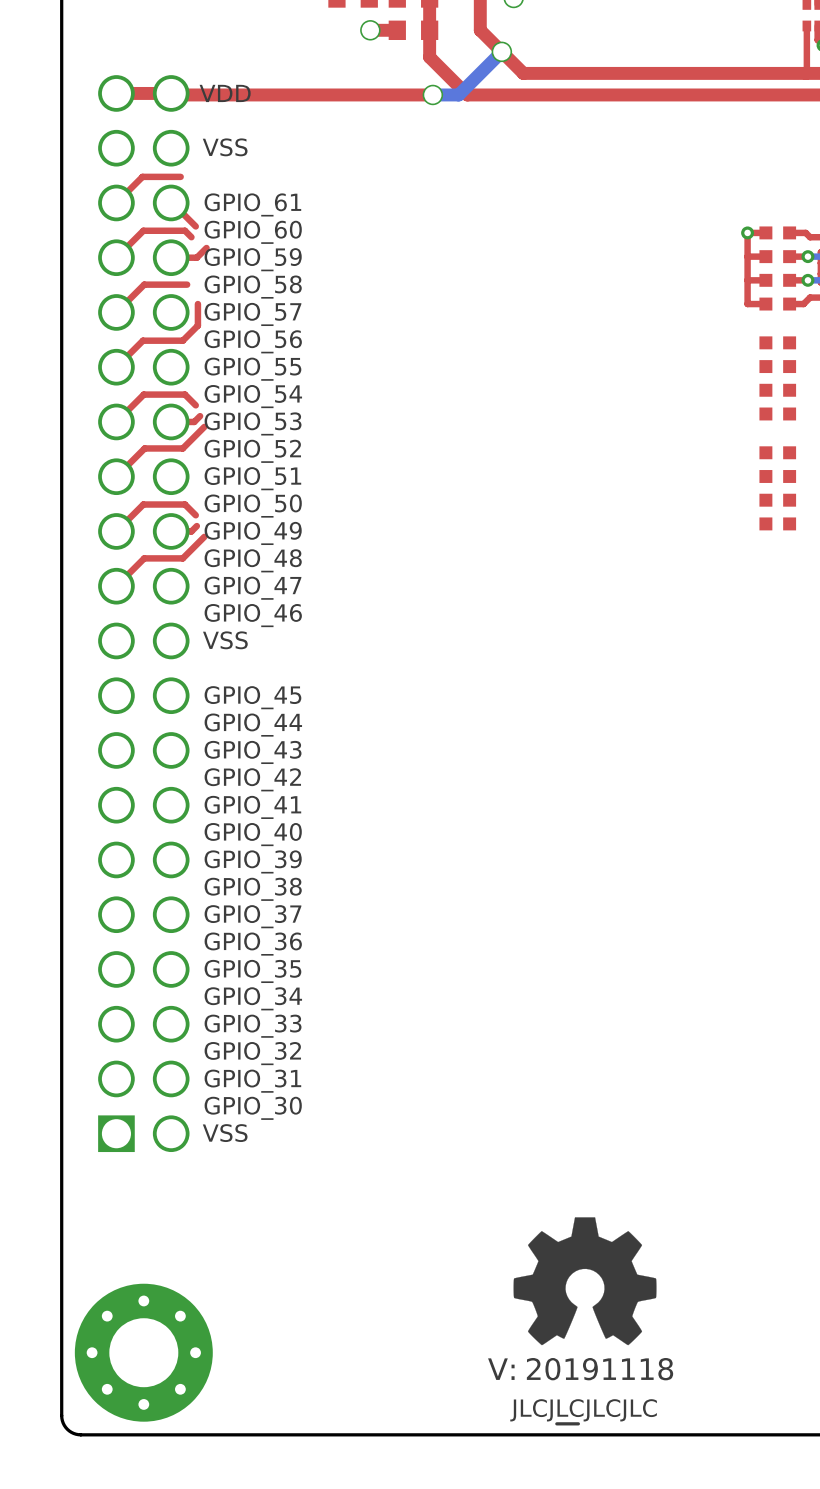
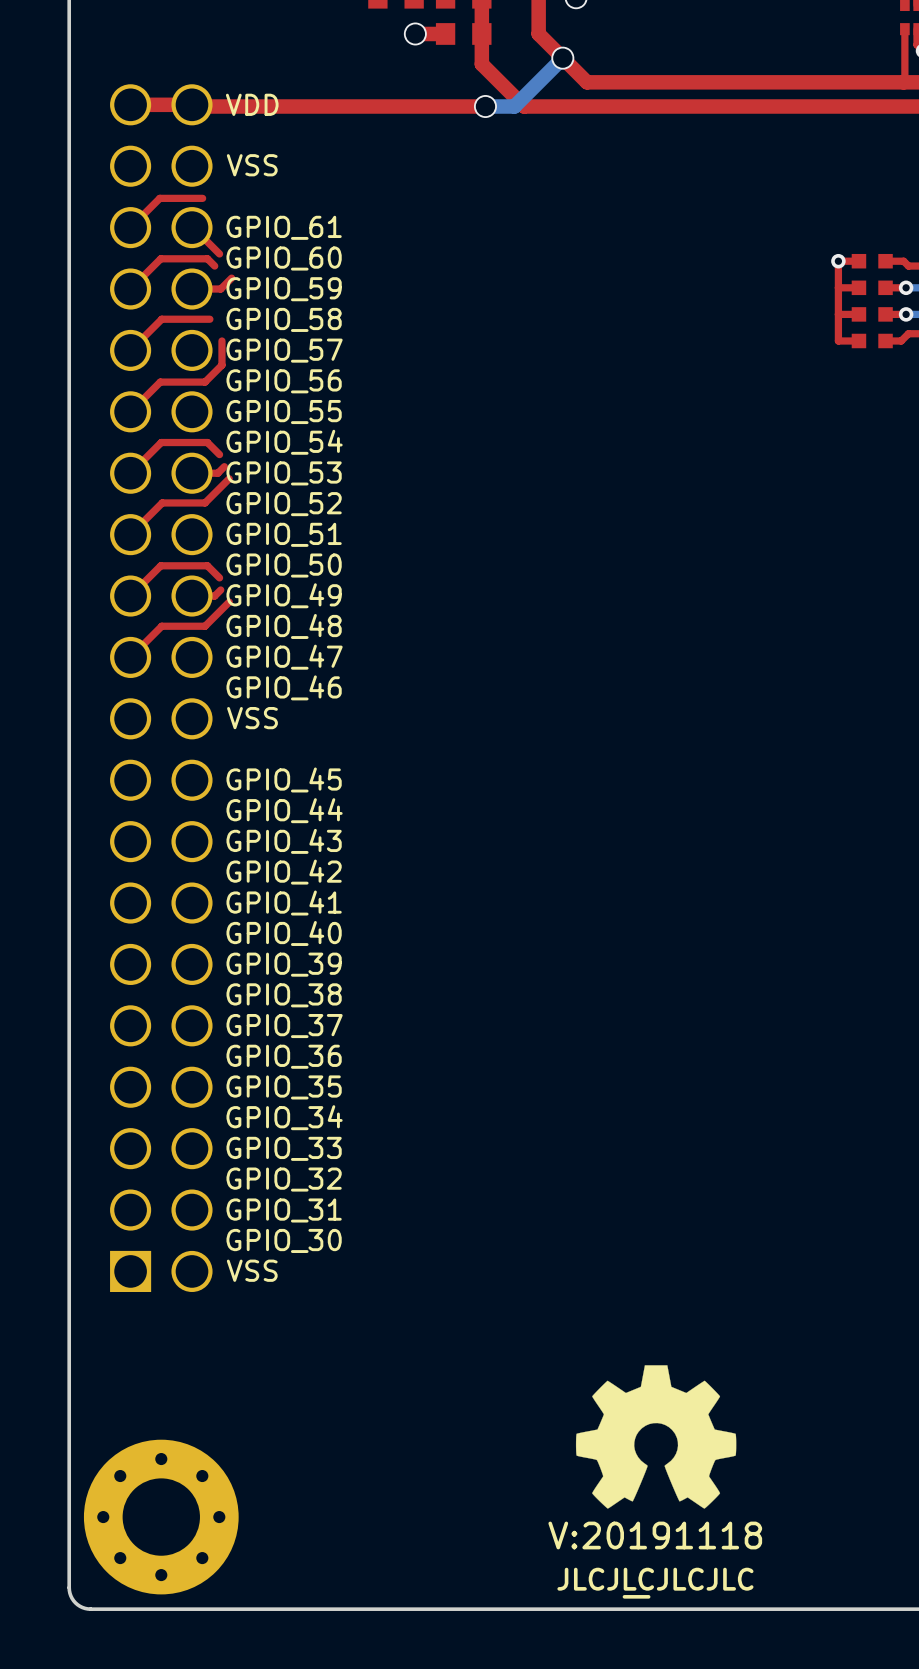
part: (777, 342) -> none
part: (777, 366) -> none
part: (777, 390) -> none
part: (777, 413) -> none
part: (777, 452) -> none
part: (777, 476) -> none
part: (777, 500) -> none
part: (777, 523) -> none

